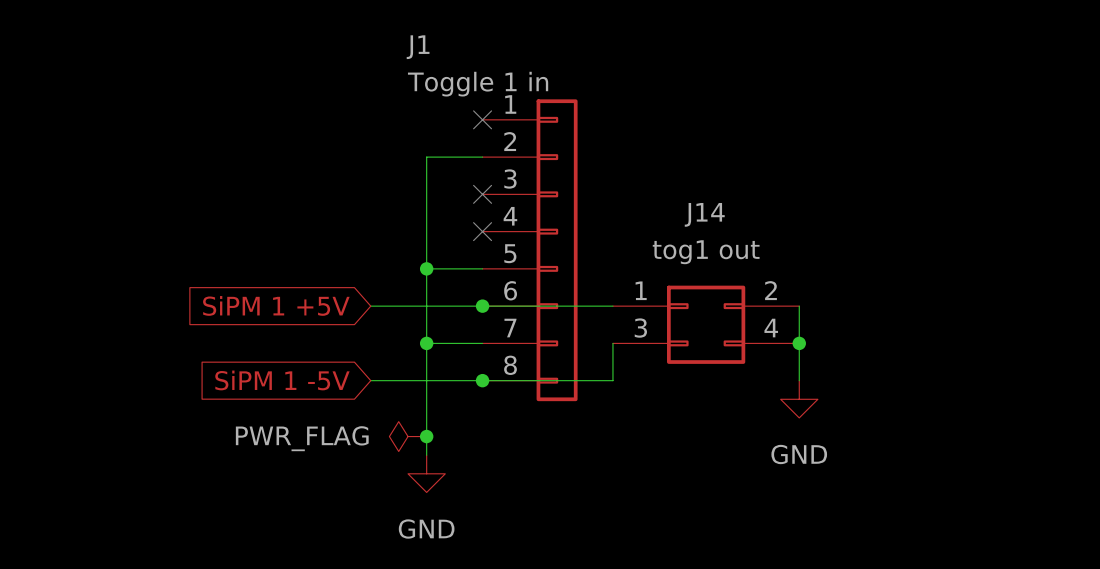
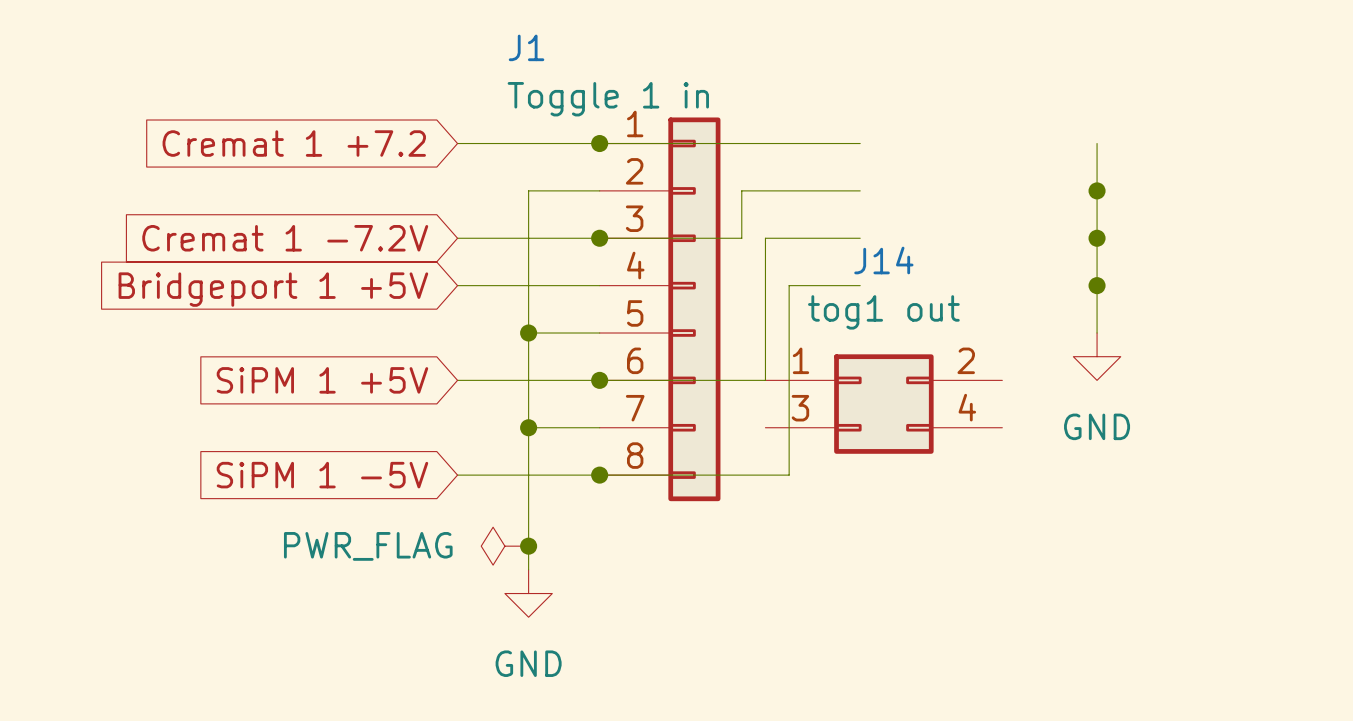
global label: none -> Cremat 1 +7.2 (294, 143)
wire: none -> (457, 143) (860, 143)
junction: none -> (599, 143)
no-connect mark: (482, 119) -> none
wire: none -> (1097, 143) (1097, 333)
wire: none -> (860, 190) (741, 190) (741, 238) (457, 238)
junction: none -> (1097, 190)
global label: none -> Cremat 1 -7.2V (285, 238)
junction: none -> (599, 238)
no-connect mark: (482, 194) -> none
wire: none -> (860, 238) (765, 238) (765, 380)
junction: none -> (1097, 238)
wire: none -> (457, 285) (599, 285)
no-connect mark: (482, 231) -> none
junction: none -> (1097, 285)
global label: none -> Bridgeport 1 +5V (273, 289)
wire: (799, 306) (799, 380) -> none
wire: (612, 343) (612, 380) -> (860, 285) (789, 285) (789, 475) (765, 475)
junction: (799, 343) -> none
power symbol position: GND (799, 399) -> GND (1097, 356)

